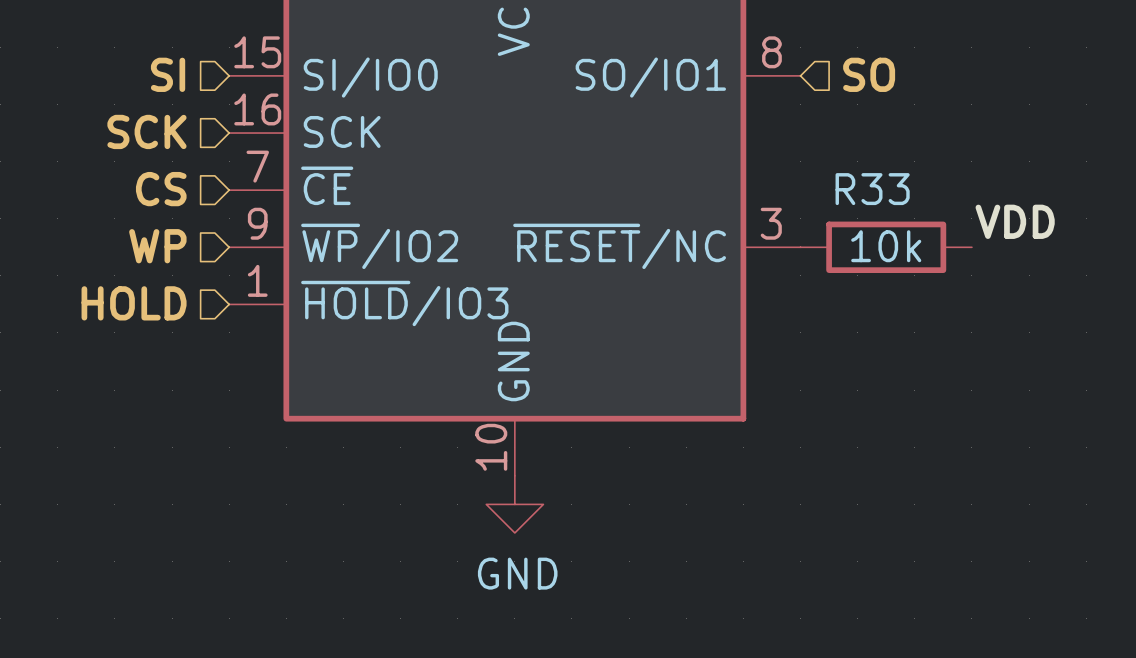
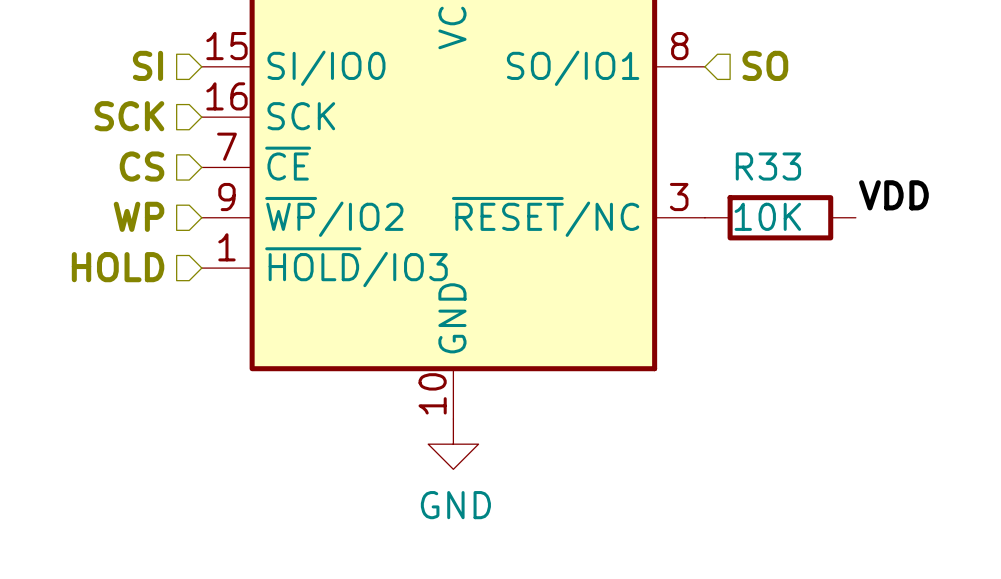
R33 value: 10k (886, 246) -> 10K (767, 216)

